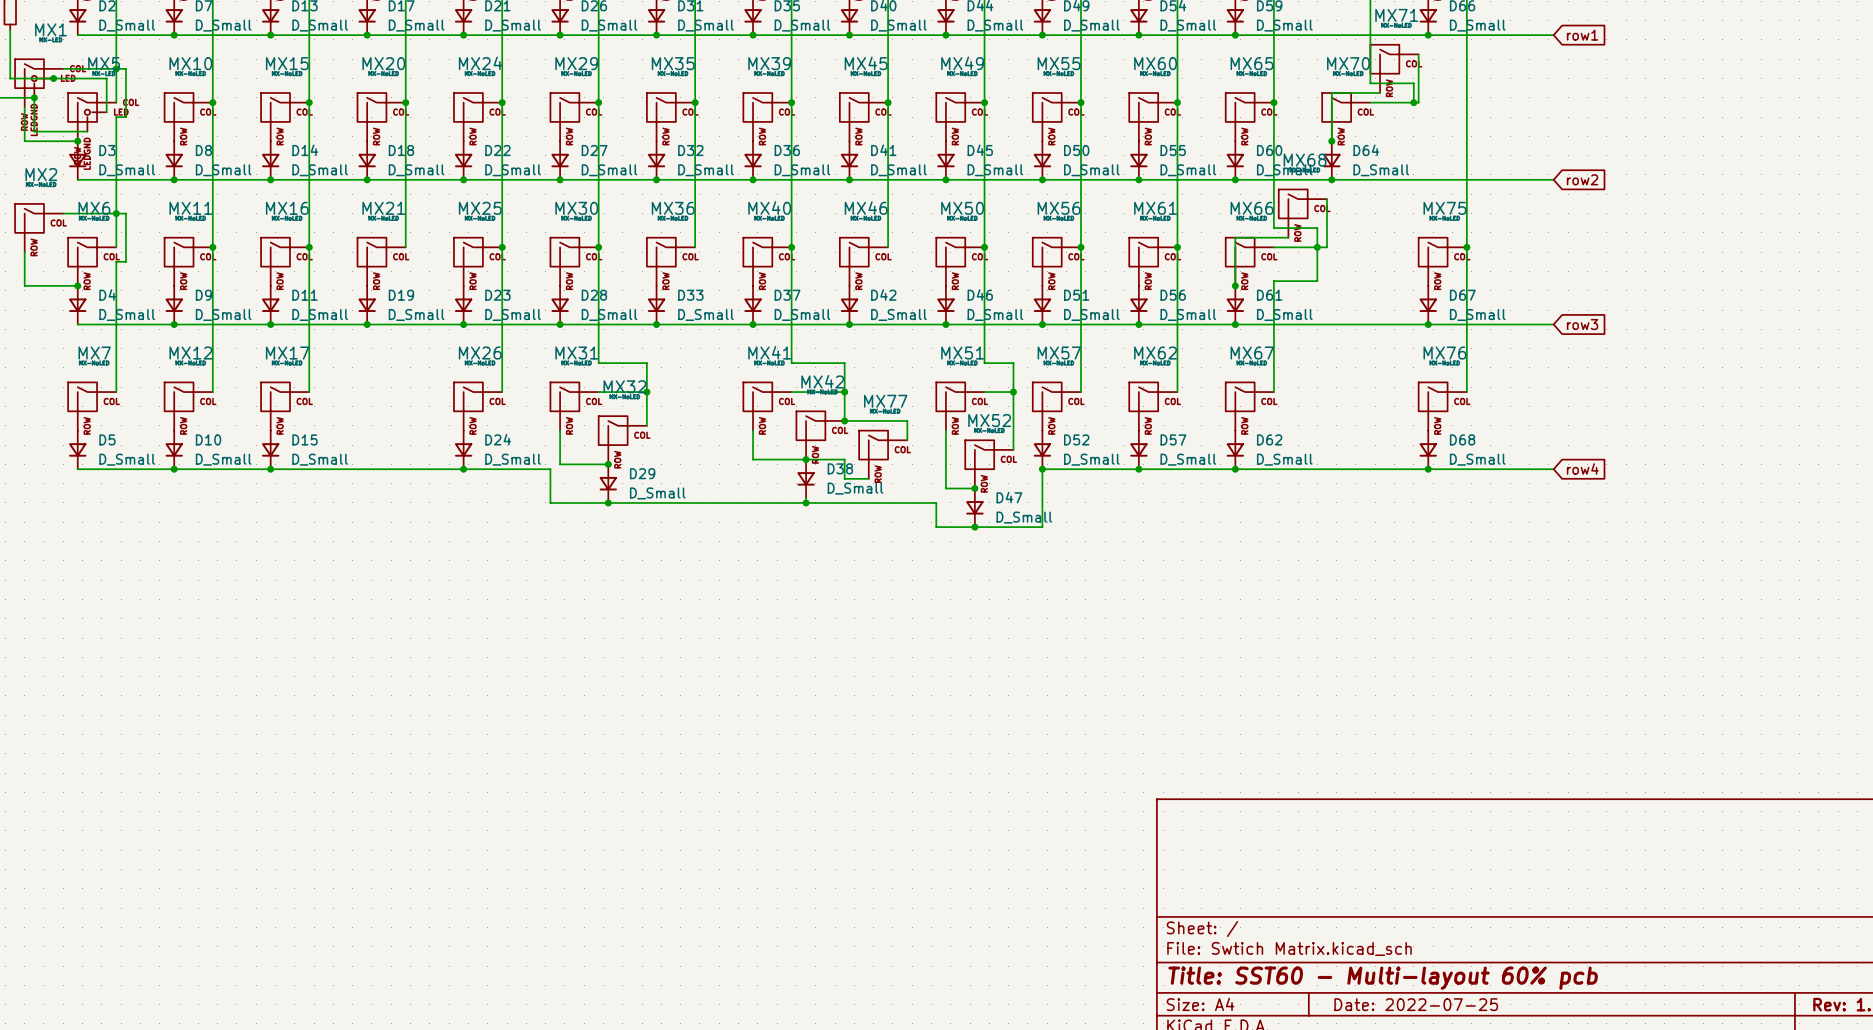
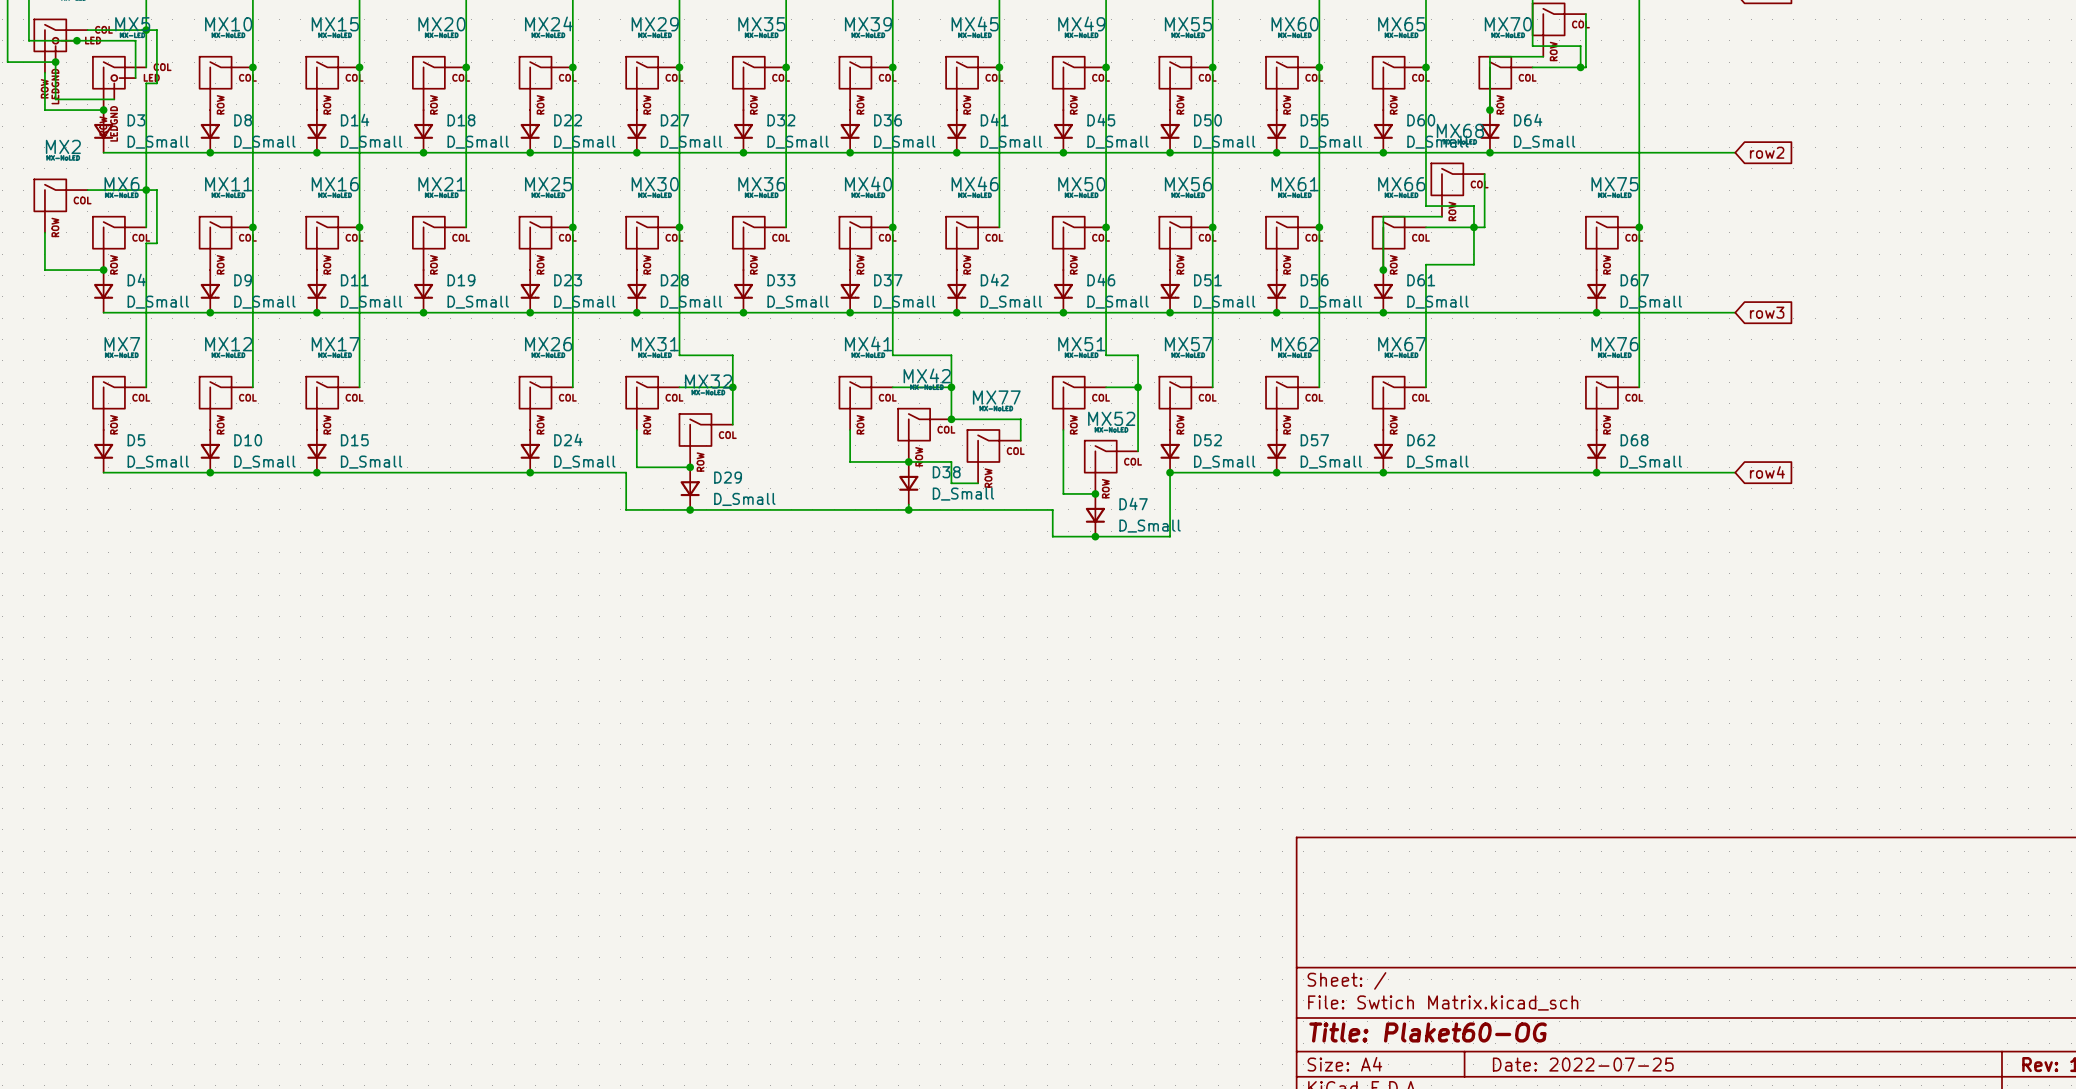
title block: Title: SST60 - Multi-layout 60% pcb (1383, 978) -> Title: Plaket60-OG (1428, 1032)

